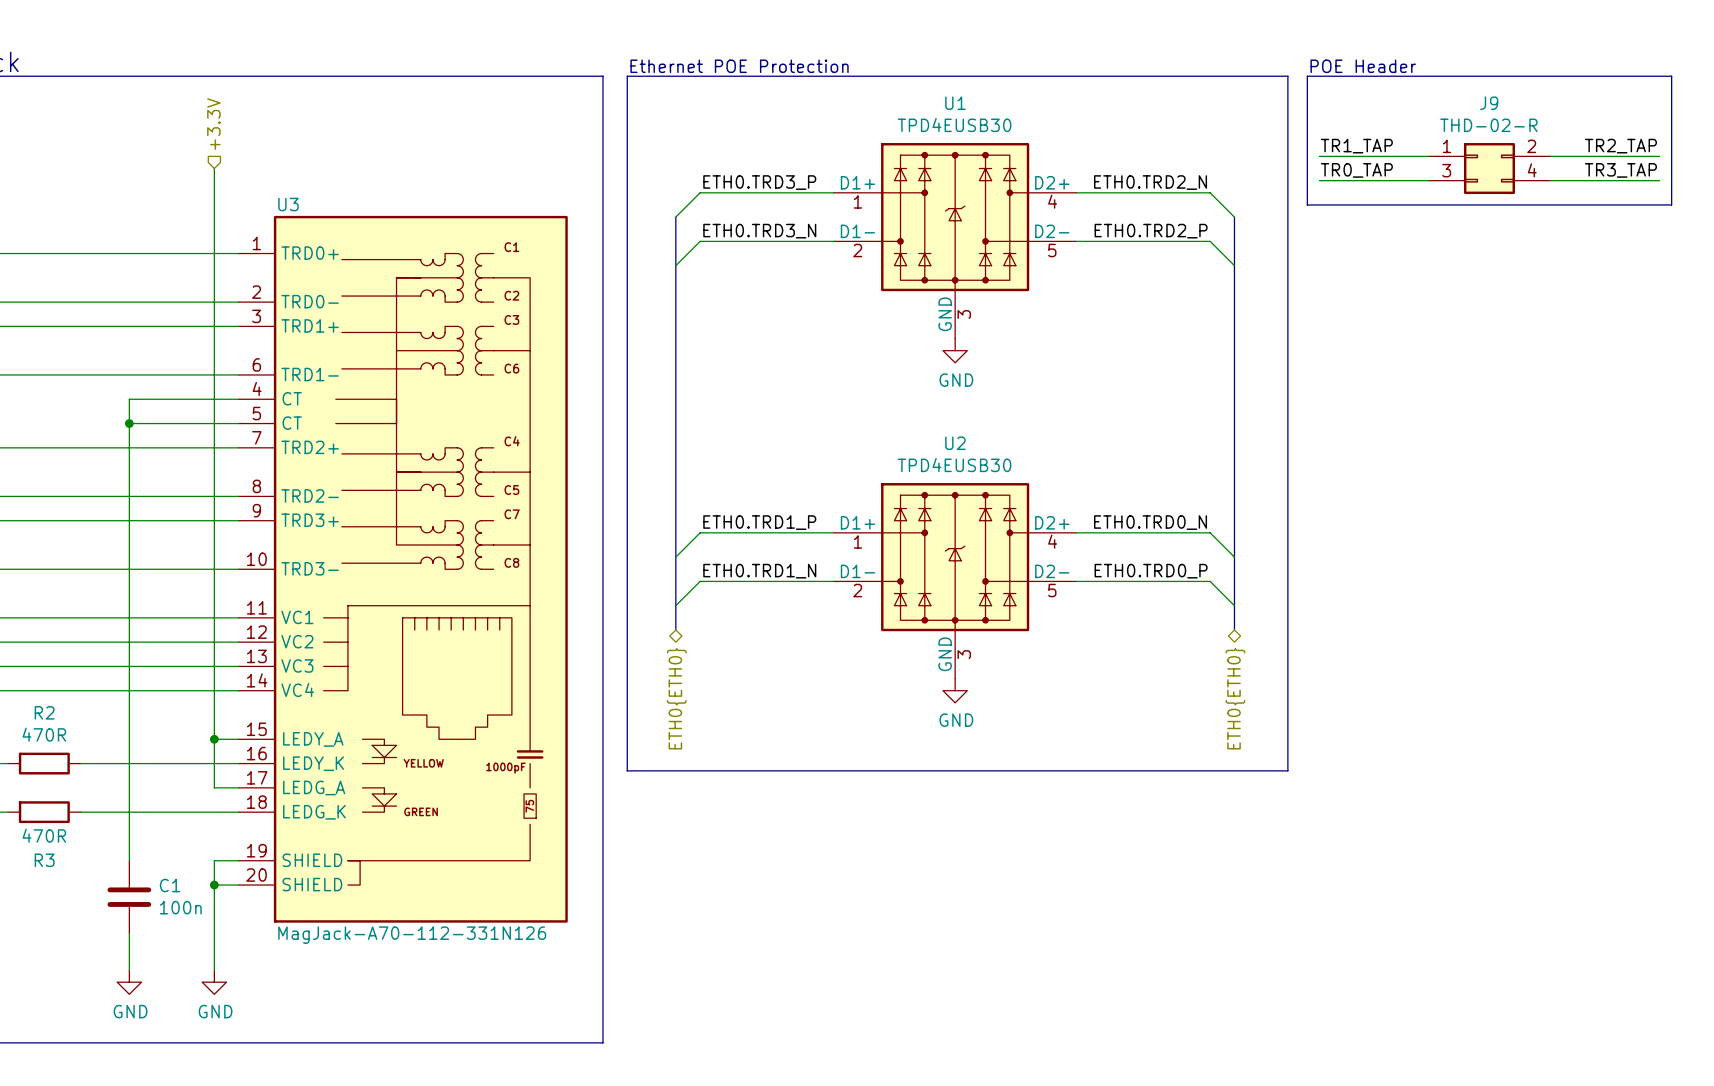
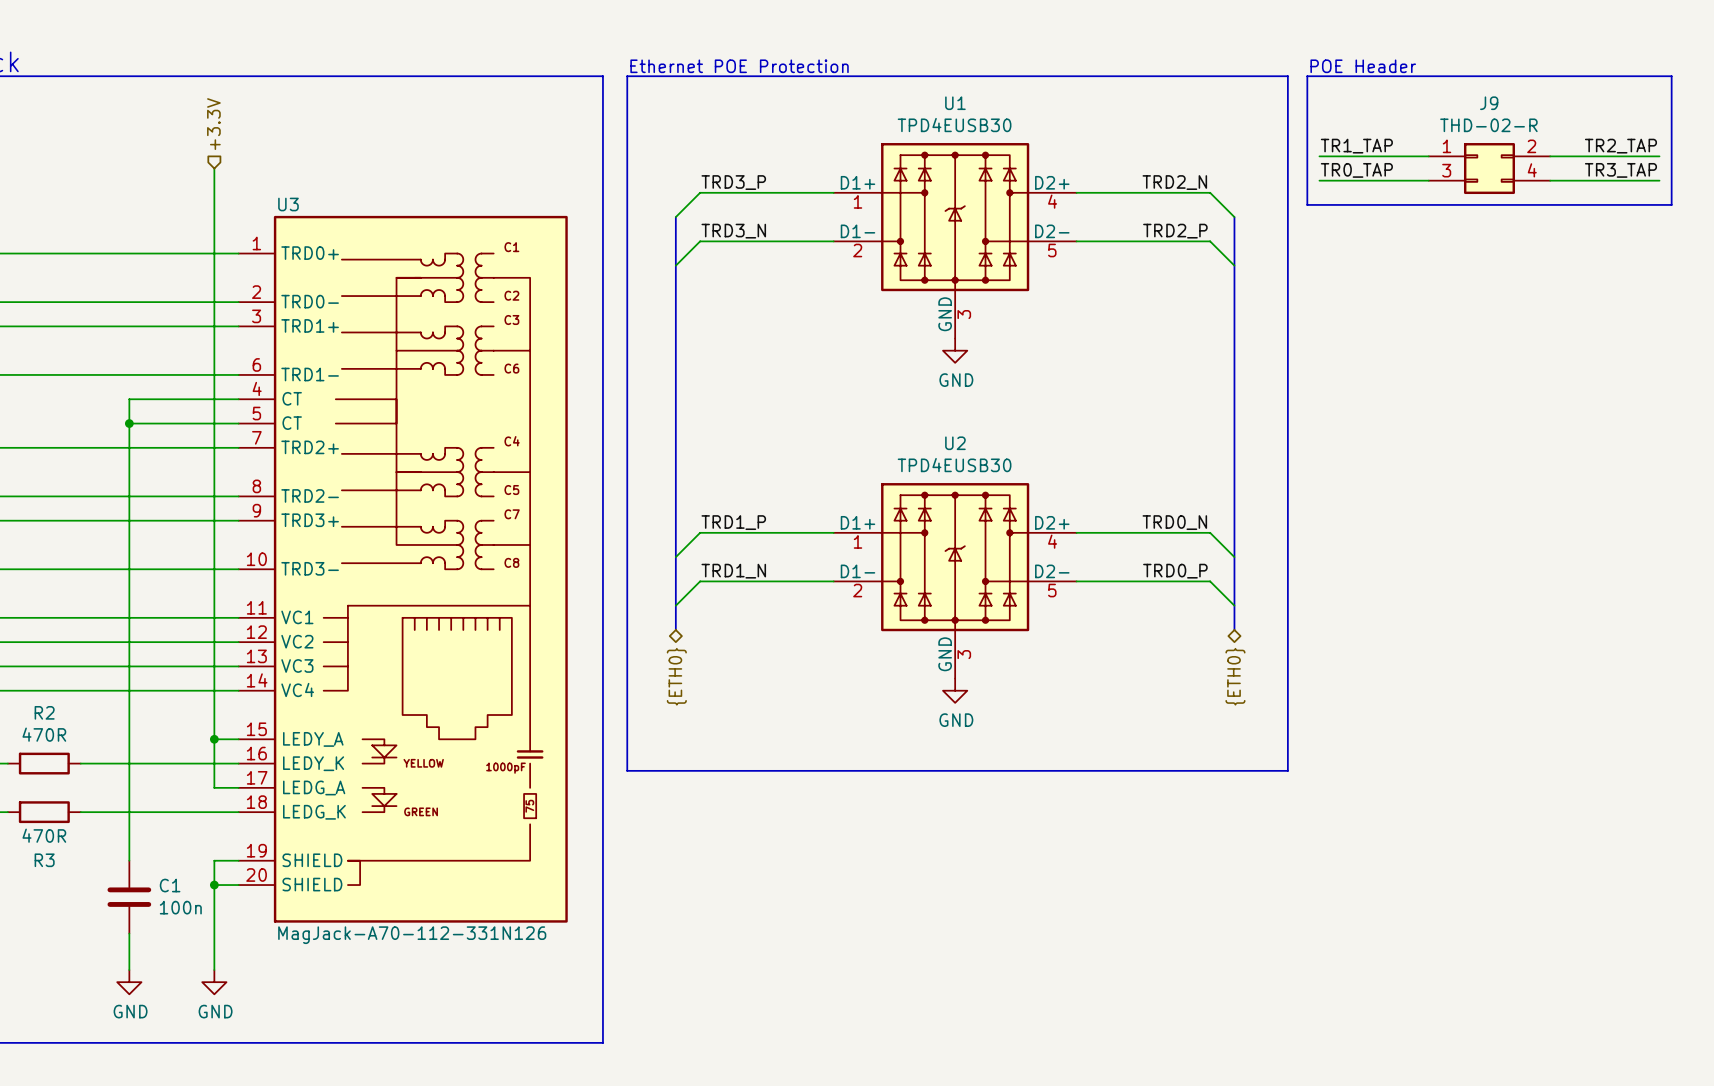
label: ETH0.TRD3_P (759, 182) -> TRD3_P (733, 182)
label: ETH0.TRD2_N (1150, 182) -> TRD2_N (1174, 182)
label: ETH0.TRD3_N (759, 231) -> TRD3_N (733, 231)
label: ETH0.TRD2_P (1151, 231) -> TRD2_P (1175, 231)
label: ETH0.TRD1_P (759, 522) -> TRD1_P (733, 522)
label: ETH0.TRD0_N (1150, 522) -> TRD0_N (1174, 522)
label: ETH0.TRD1_N (759, 571) -> TRD1_N (733, 571)
label: ETH0.TRD0_P (1151, 571) -> TRD0_P (1175, 571)
hierarchical label: ETH0{ETH0} (676, 698) -> {ETH0} (676, 676)
hierarchical label: ETH0{ETH0} (1235, 698) -> {ETH0} (1235, 676)

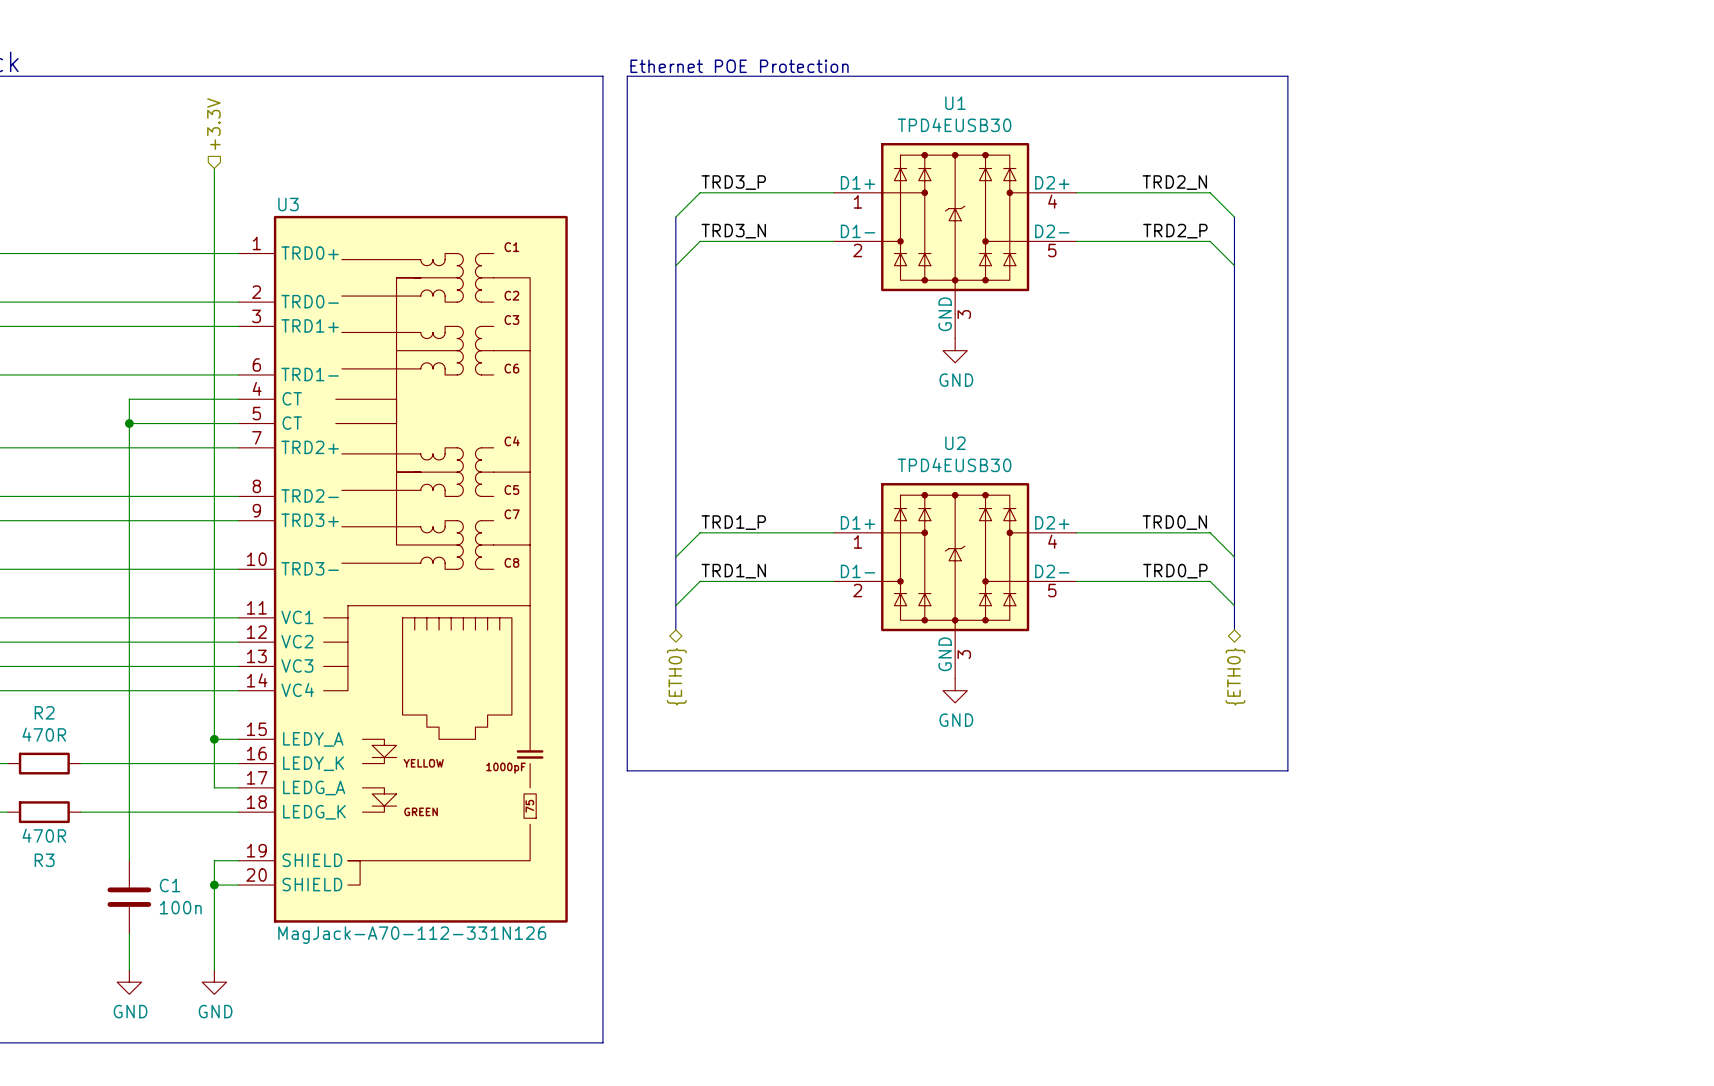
text: POE Header (1363, 66) -> none
line: (1307, 76) (1671, 76) (1671, 204) (1307, 204) (1307, 76) -> none
label: TR1_TAP (1356, 146) -> none
label: TR2_TAP (1620, 146) -> none
wire: (1319, 156) (1428, 156) -> none
wire: (1550, 156) (1659, 156) -> none
J9: THD-02-R (1489, 168) -> none
label: TR0_TAP (1356, 170) -> none
label: TR3_TAP (1620, 170) -> none
wire: (1319, 180) (1428, 180) -> none
wire: (1550, 180) (1659, 180) -> none

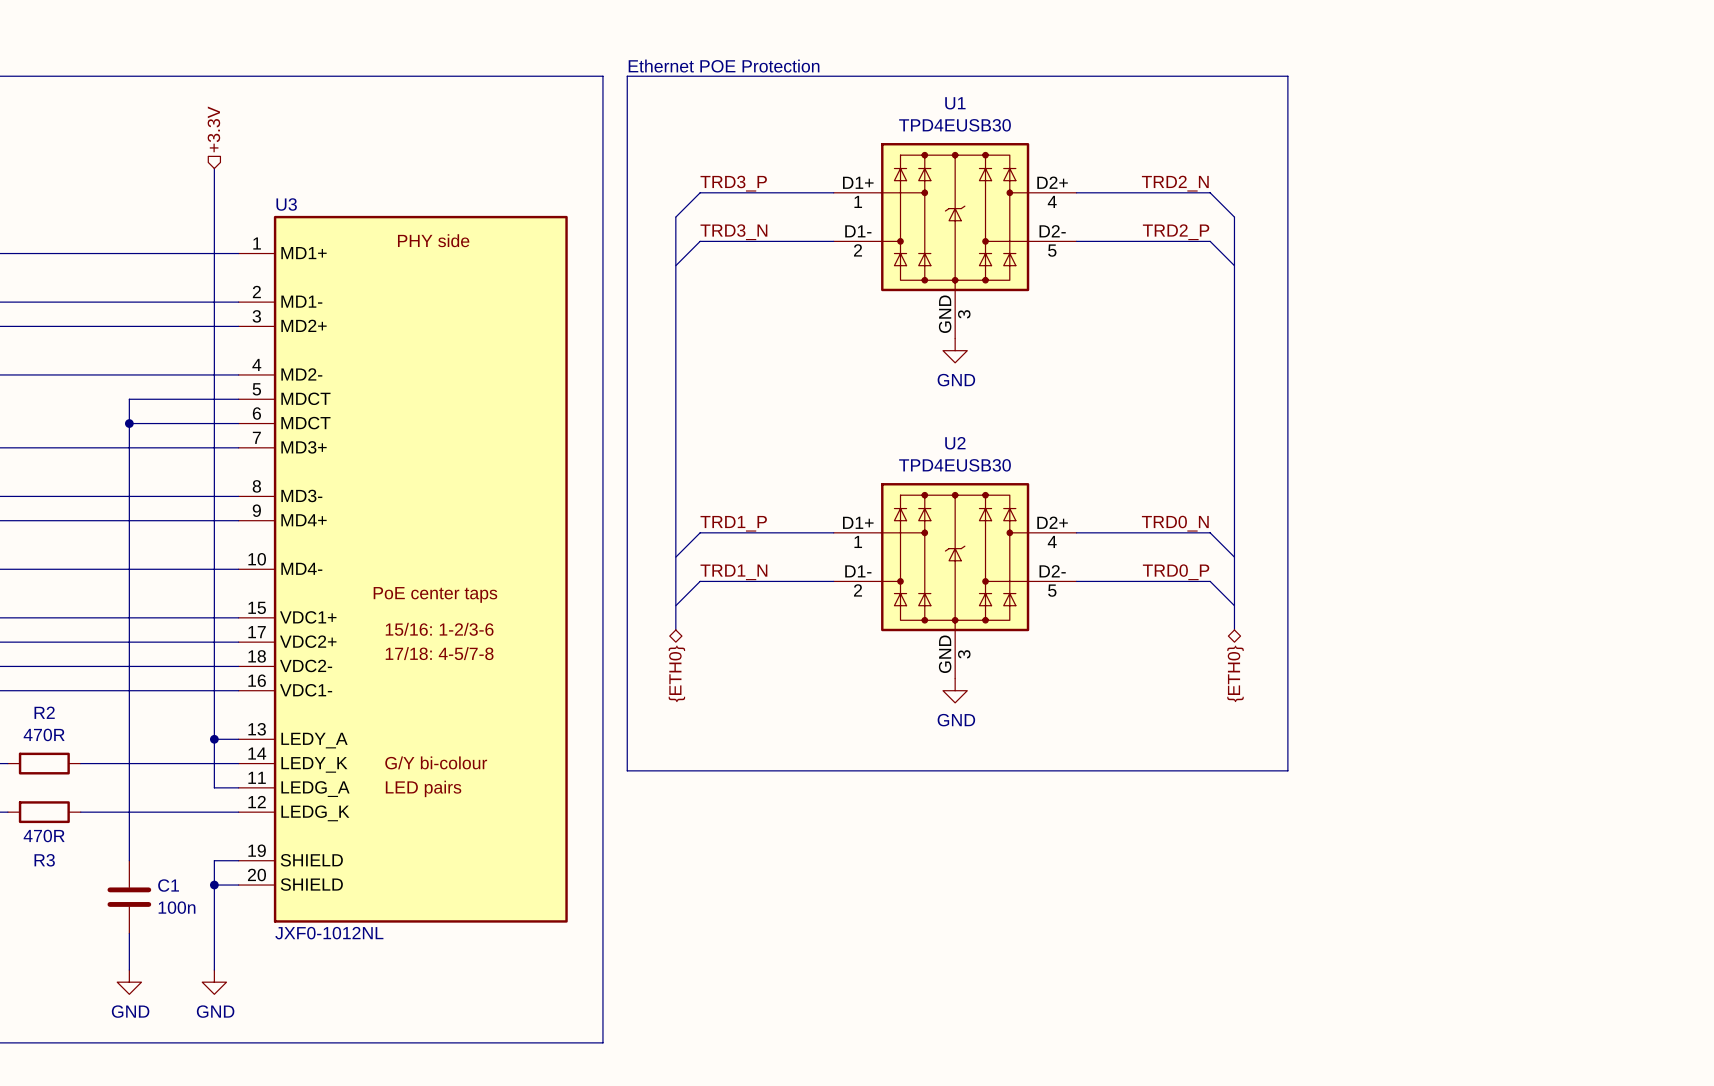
U3 symbol: [238, 215, 568, 923] -> [238, 215, 568, 923]
U3 value: MagJack-A70-112-331N126 (412, 935) -> JXF0-1012NL (329, 933)

